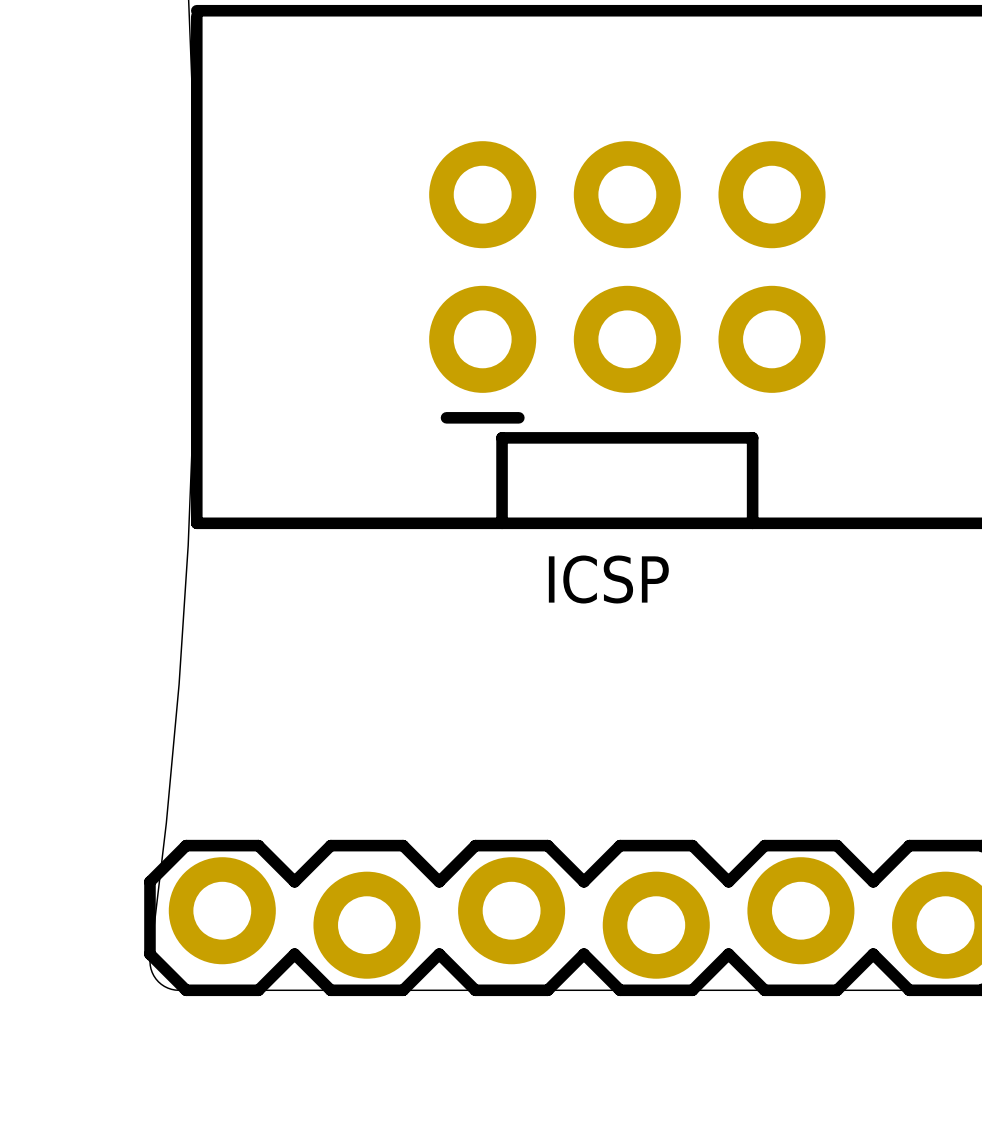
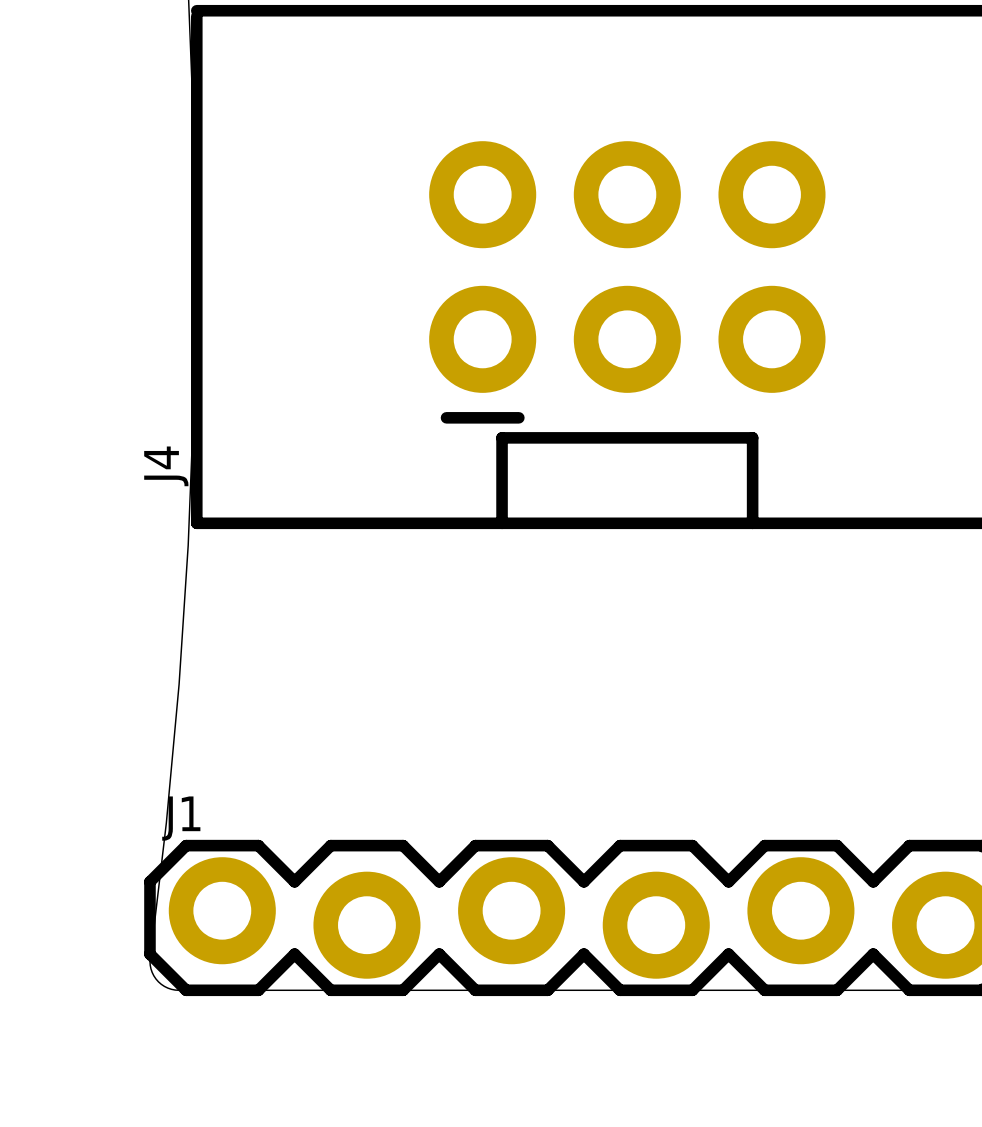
ICSP name: ICSP (608, 579) -> J4 (166, 466)
J1 name: none -> J1 (181, 818)

